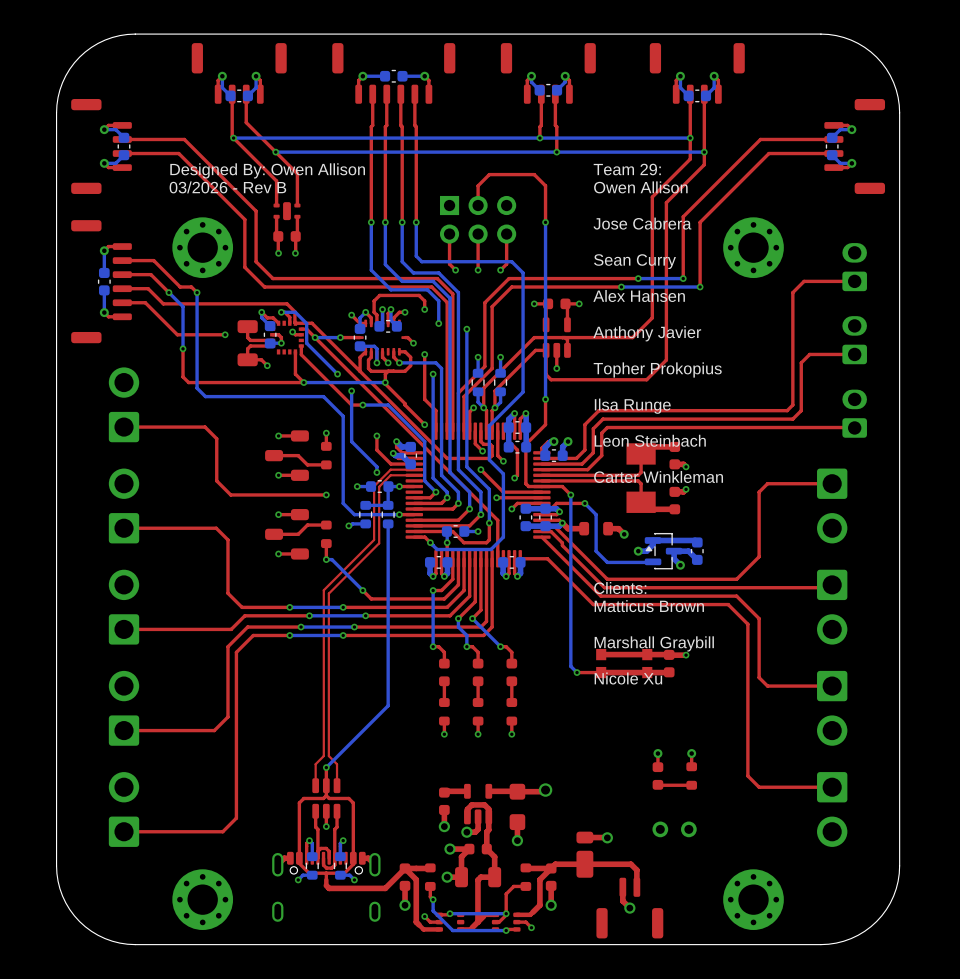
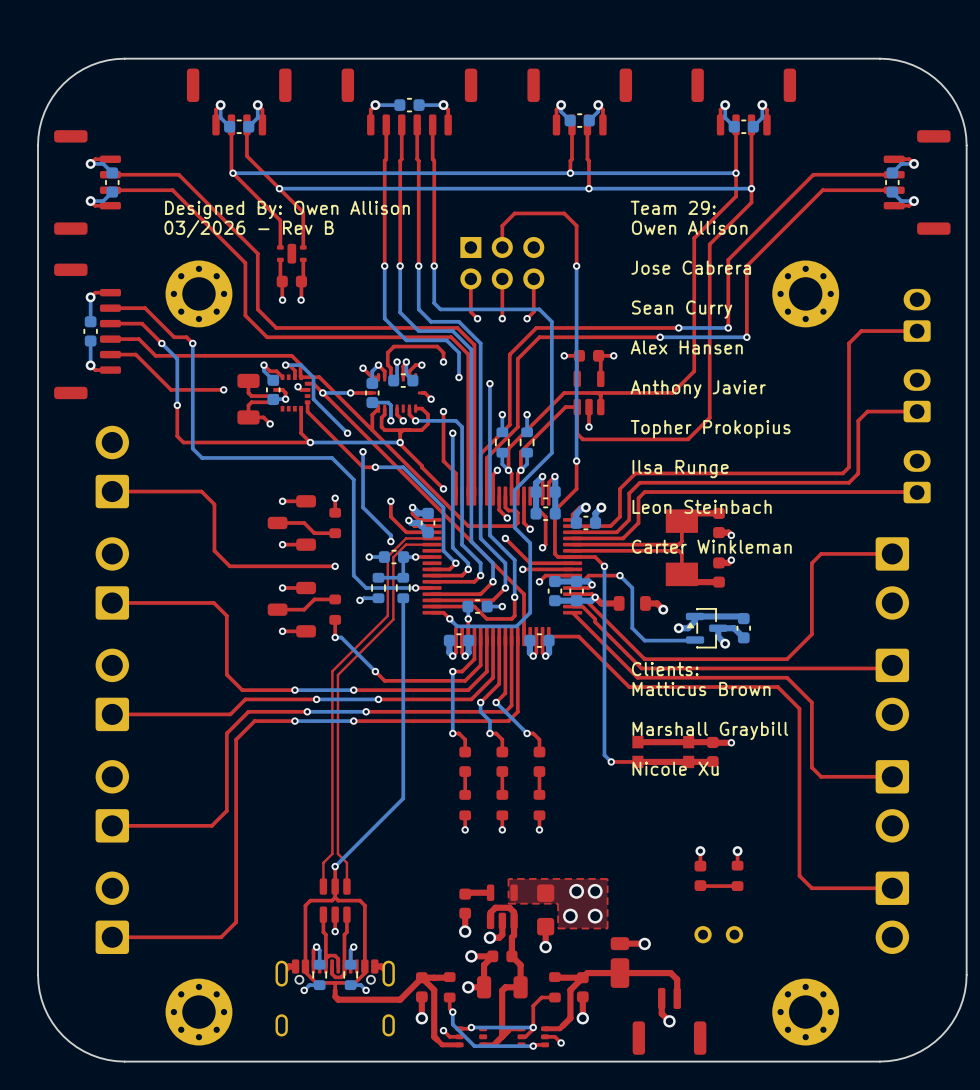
top zone outline: none -> (607, 878) (508, 878) (508, 903) (558, 903) (558, 928) (607, 928) (607, 878)
top track: (545, 790) (543, 791) (517, 791) -> none
via: none -> (595, 891)
top track: (515, 791) (488, 791) -> none
via: none -> (570, 916)
via: none -> (595, 916)

